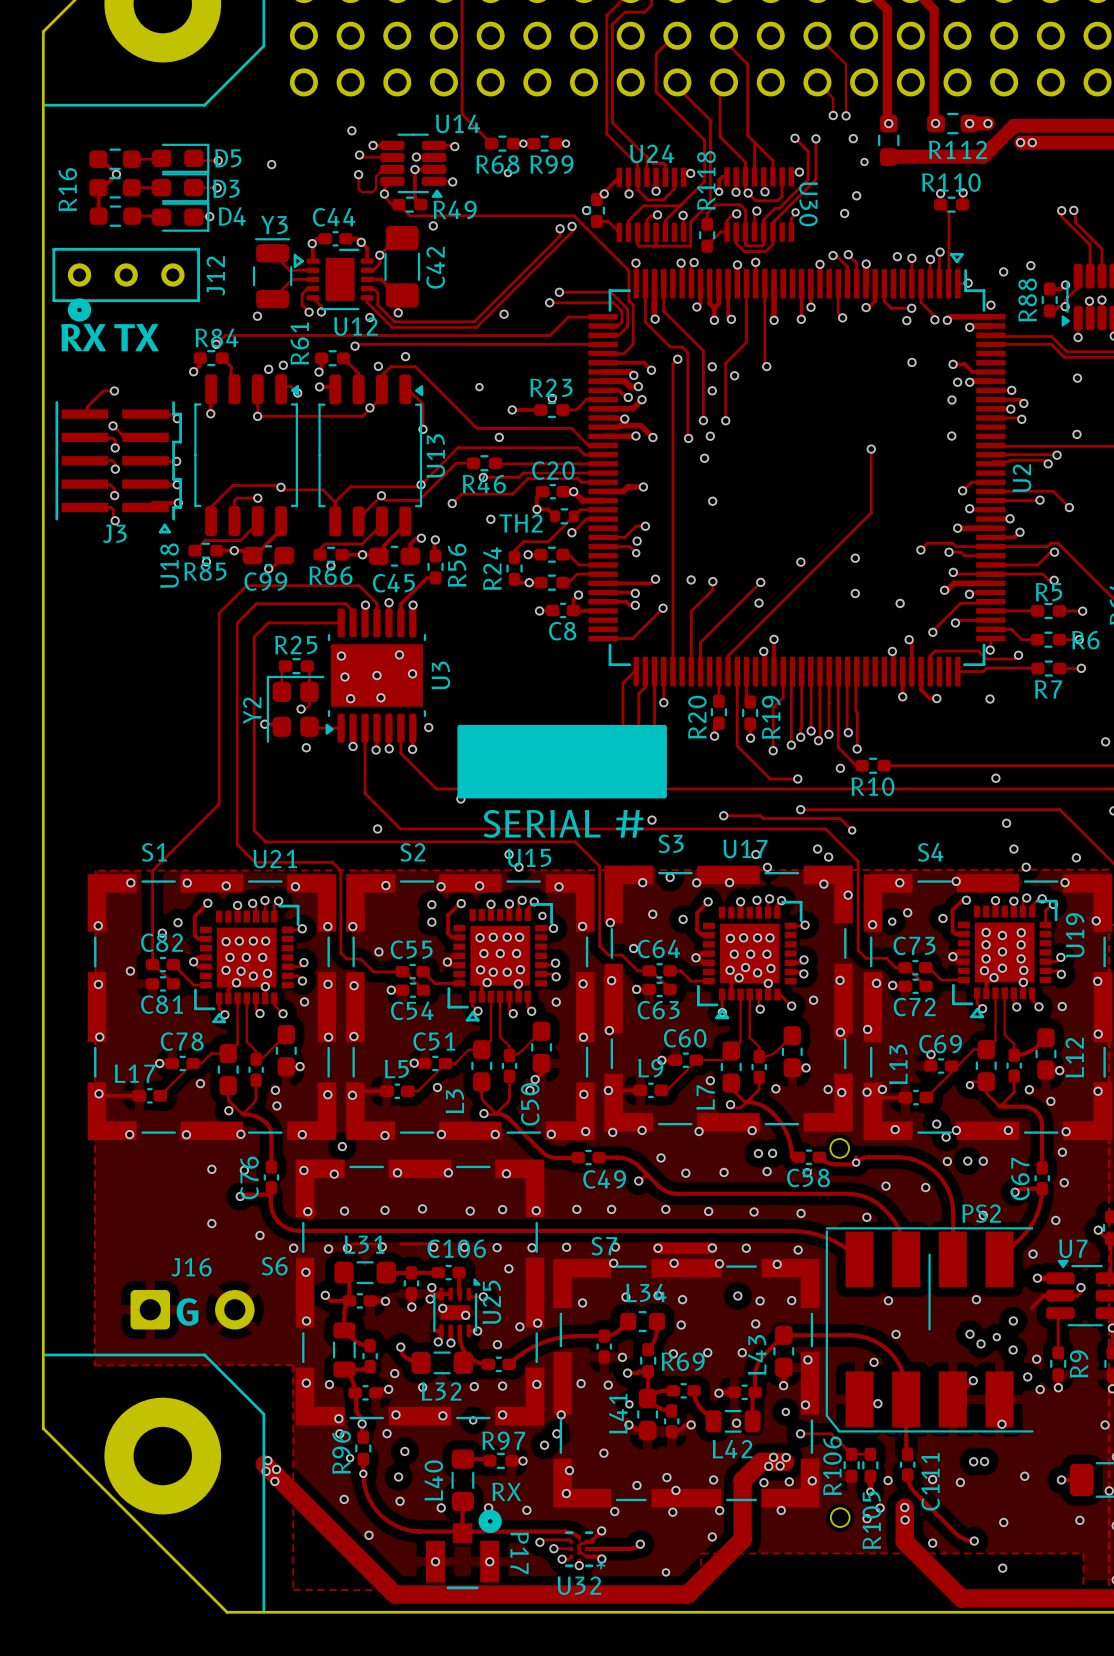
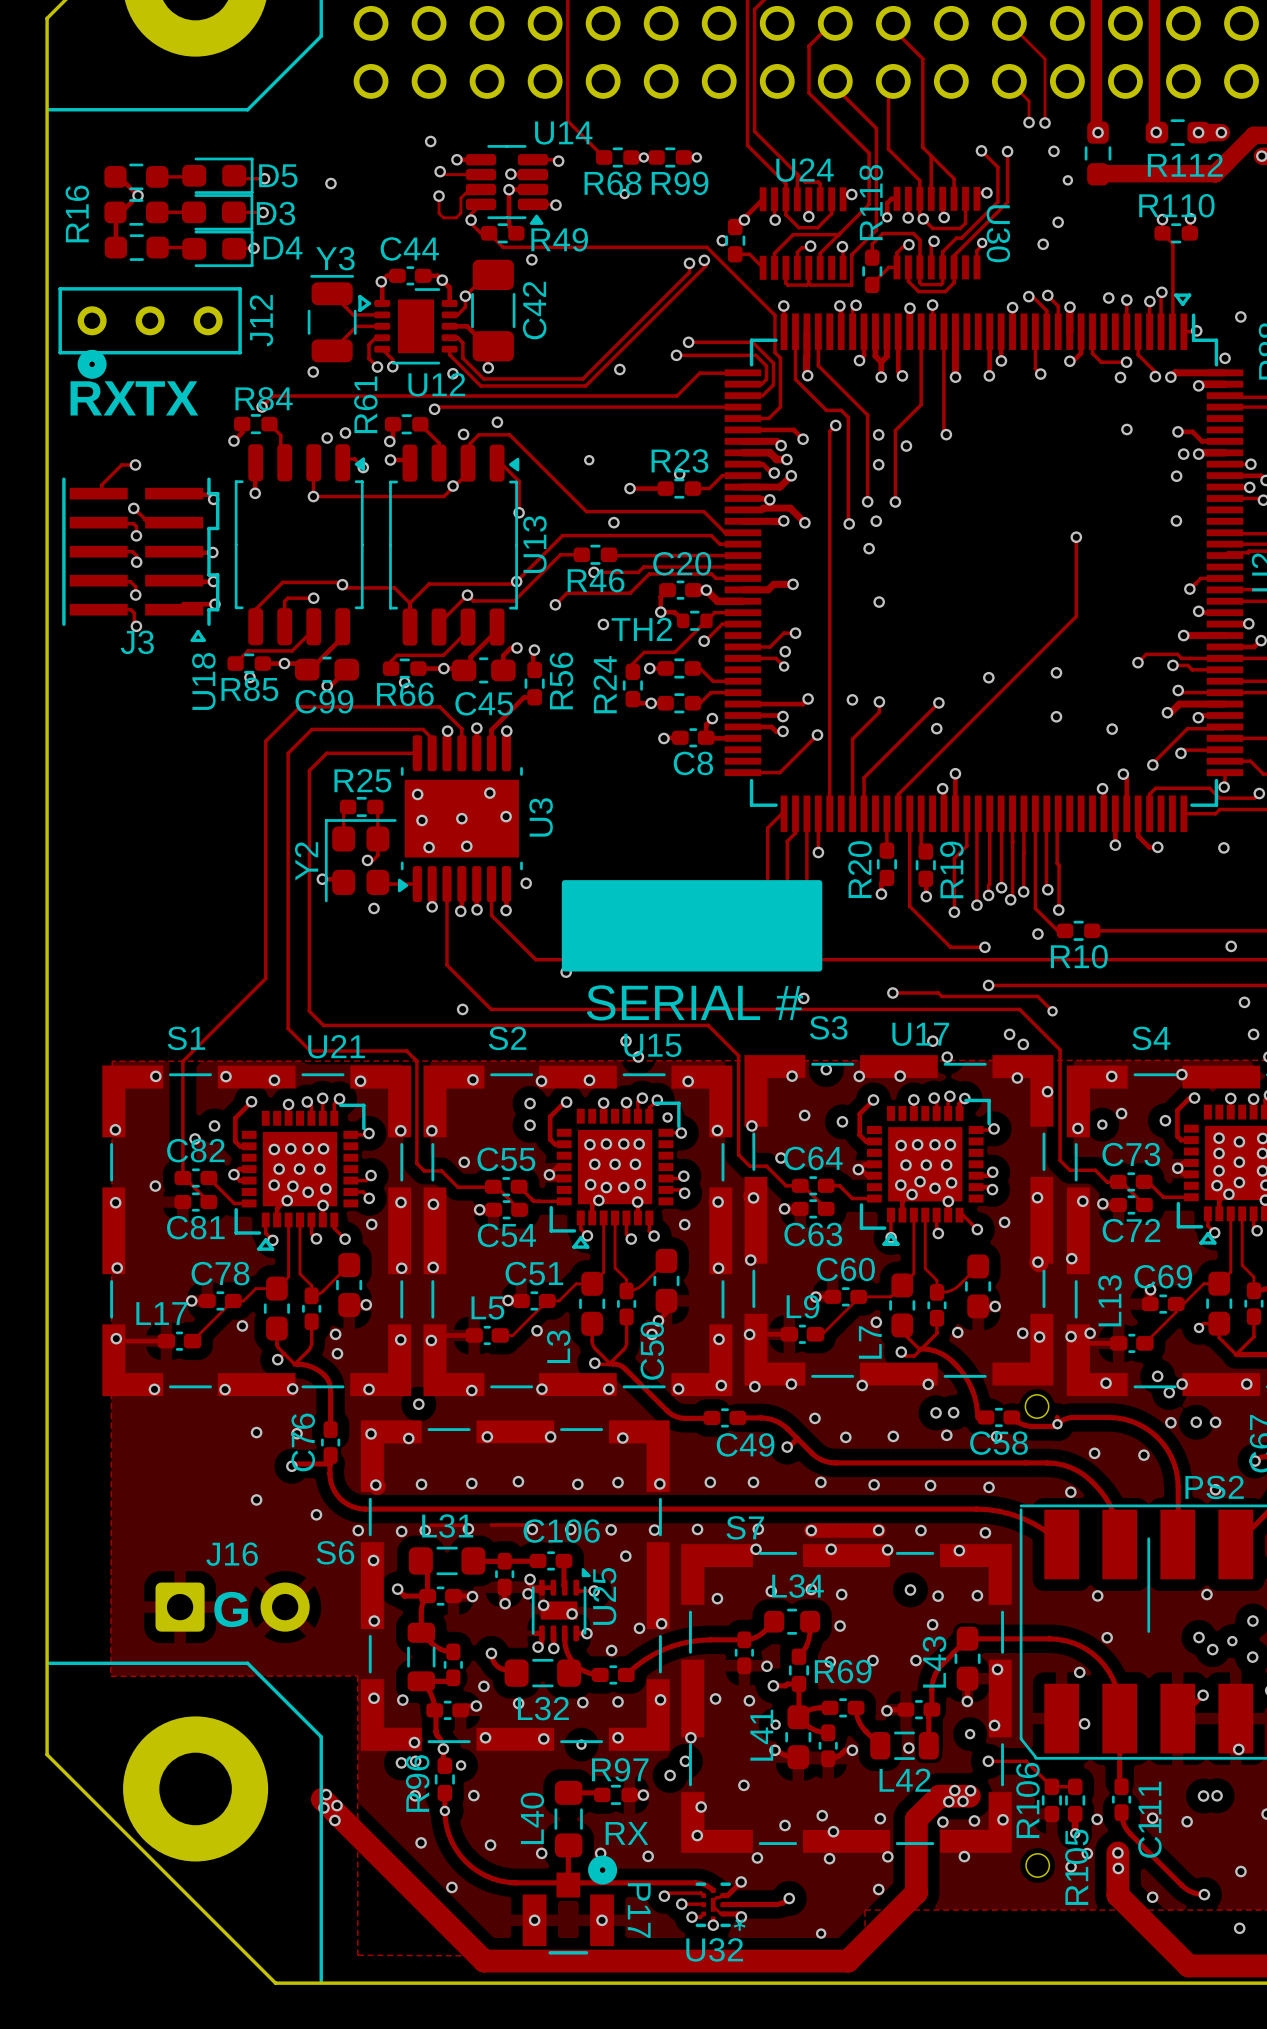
via: (387, 1433) -> none
via: none -> (401, 1762)
via: (404, 1451) -> none
via position: (350, 1458) -> (461, 1765)
via: none -> (415, 1795)
via: none -> (473, 1795)
via: (398, 1477) -> none

